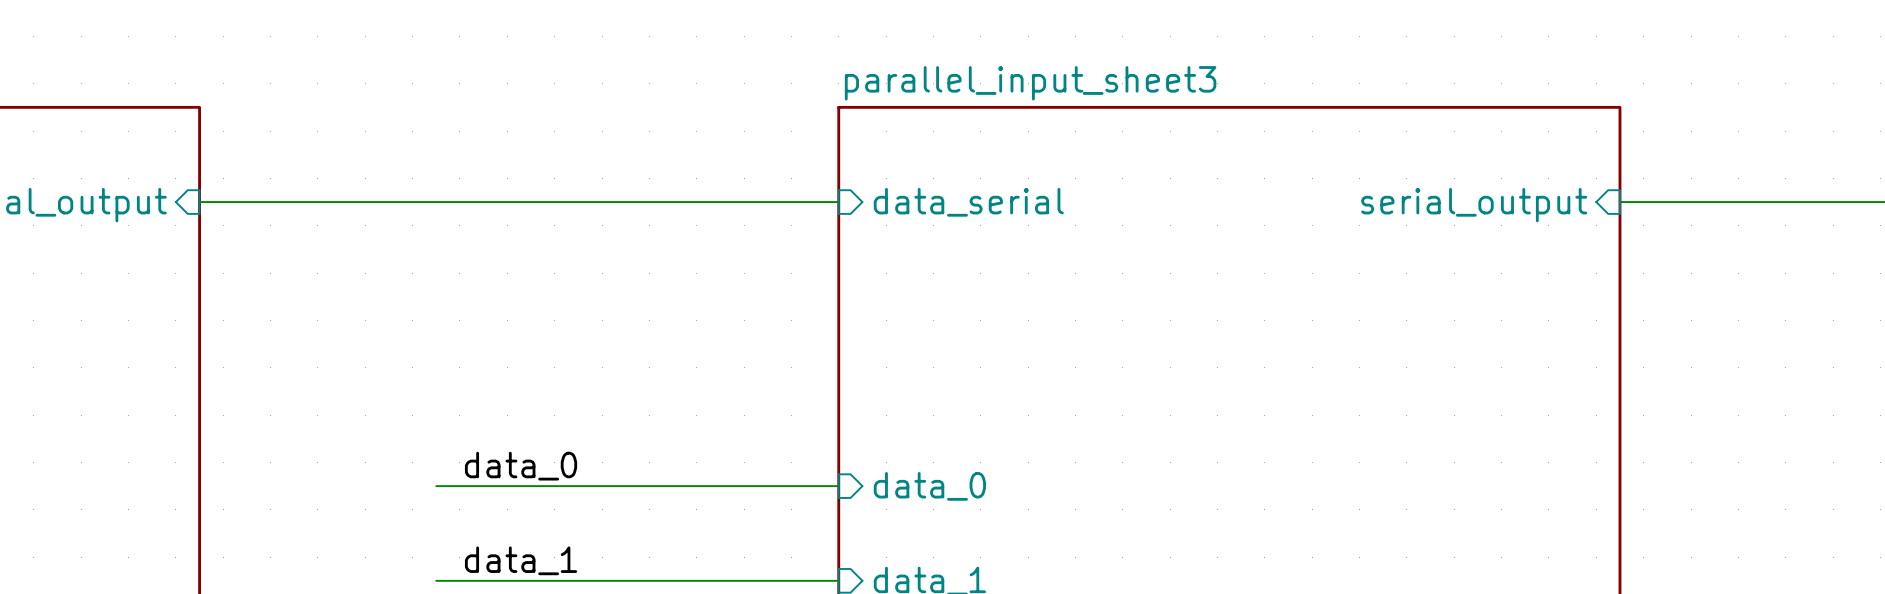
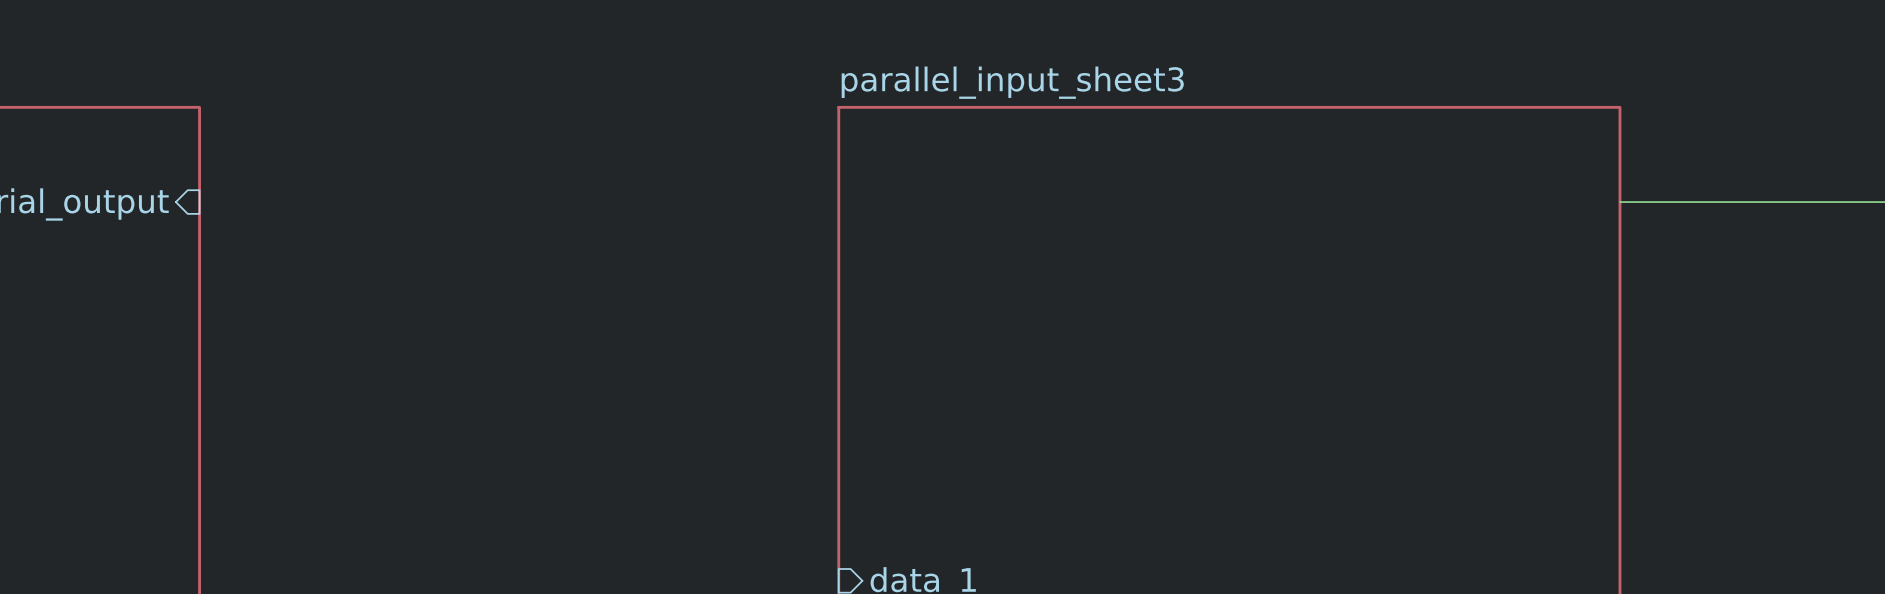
wire: (199, 202) (838, 202) -> none
sheet pin: data_serial (968, 202) -> none
sheet pin: serial_output (1474, 205) -> none
label: data_0 (521, 466) -> none
wire: (436, 486) (838, 486) -> none
sheet pin: data_0 (929, 486) -> none
label: data_1 (521, 560) -> none
wire: (436, 580) (838, 580) -> none

